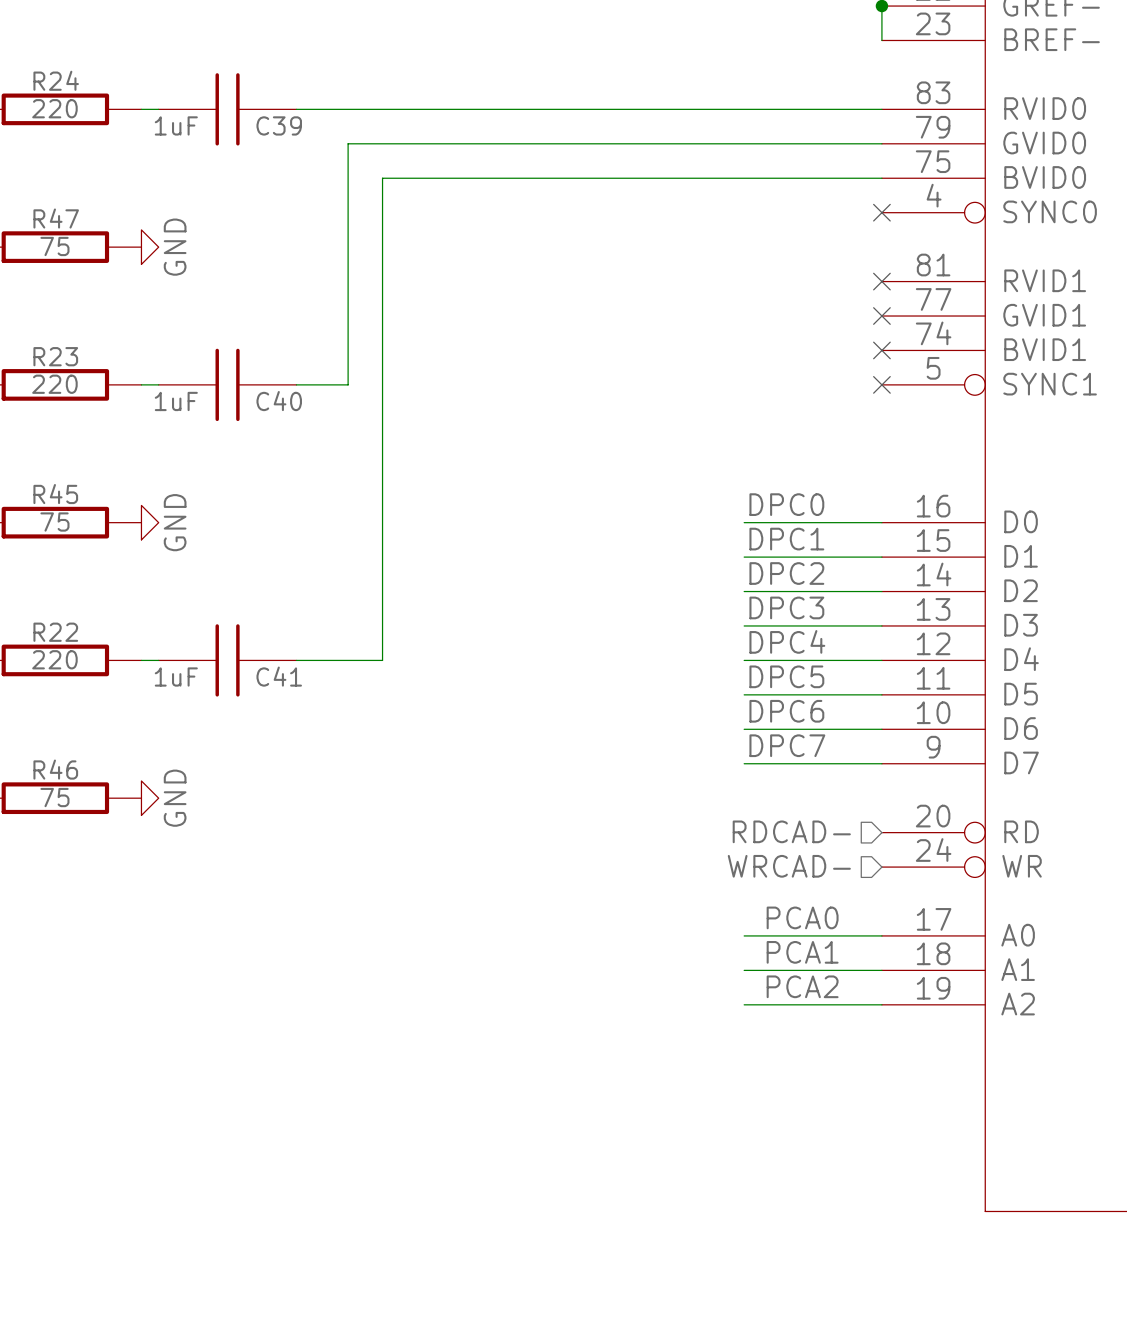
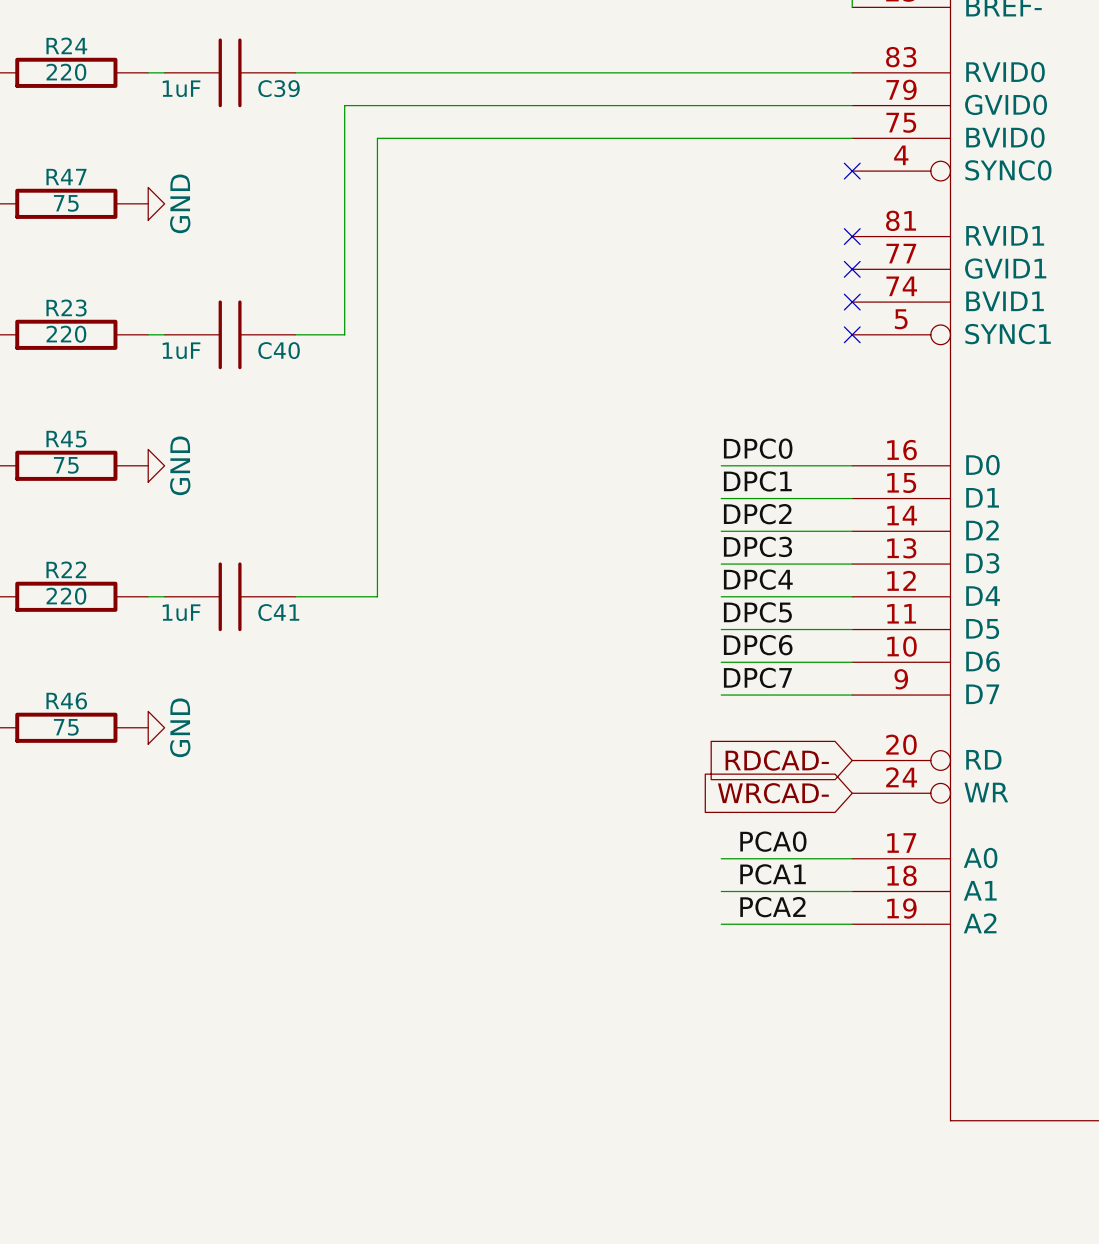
hierarchical label: RDCAD- (791, 831) -> none
global label: none -> RDCAD- (777, 760)
hierarchical label: WRCAD- (789, 866) -> none
global label: none -> WRCAD- (773, 793)

